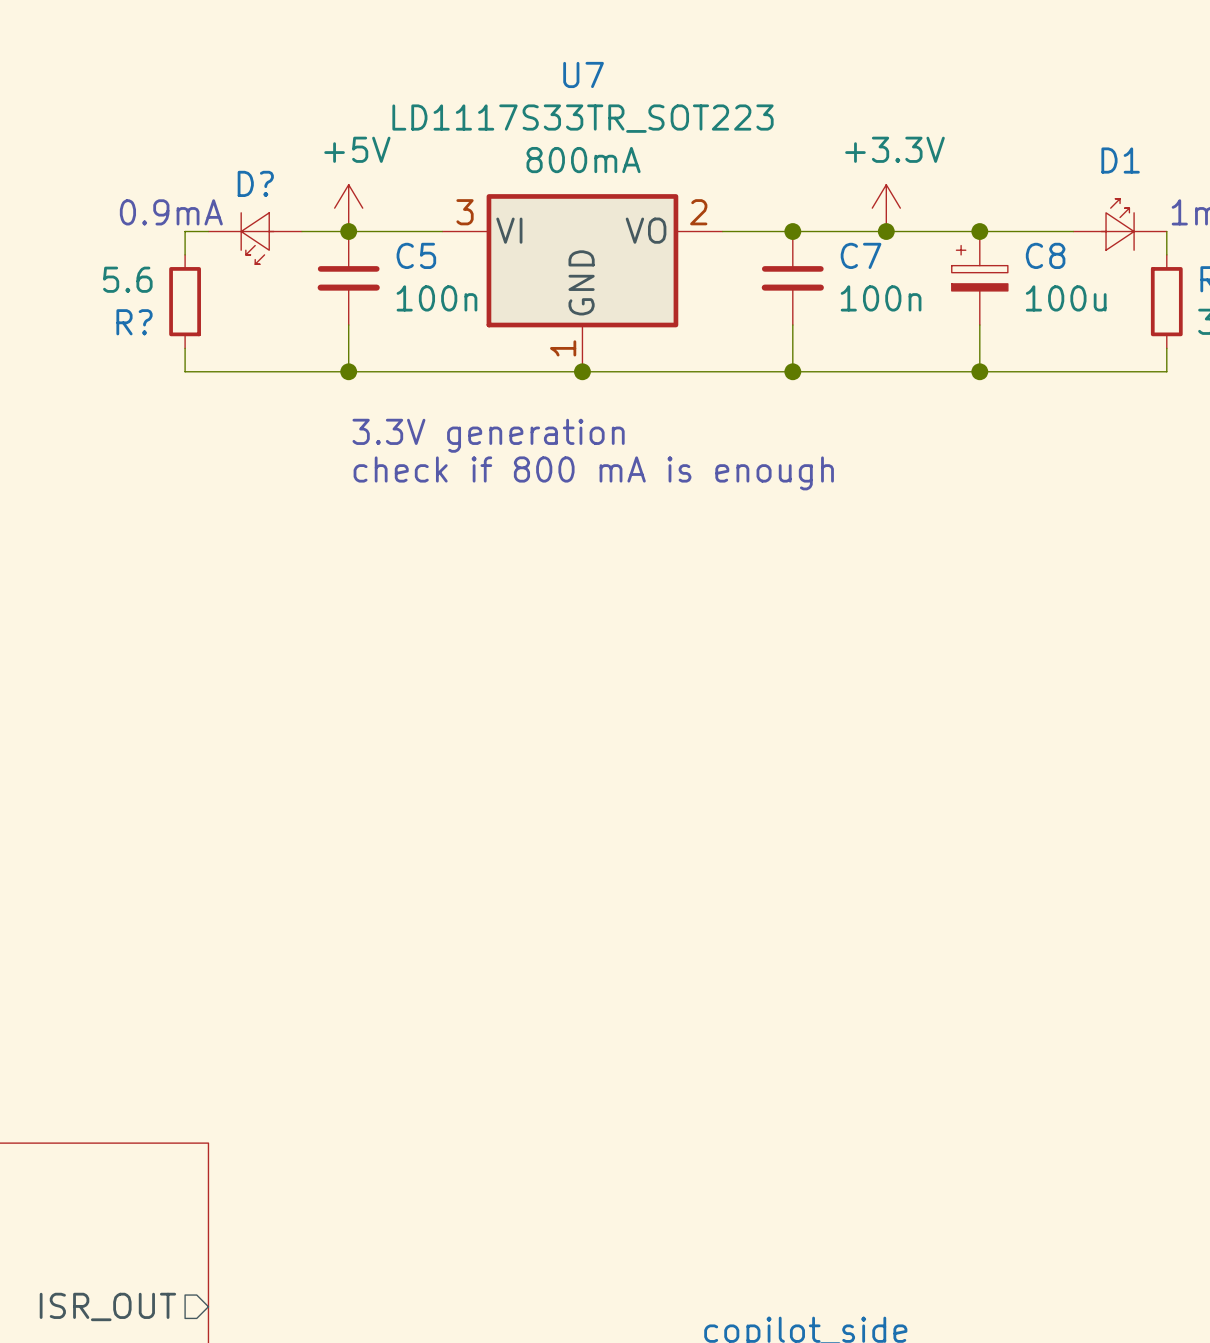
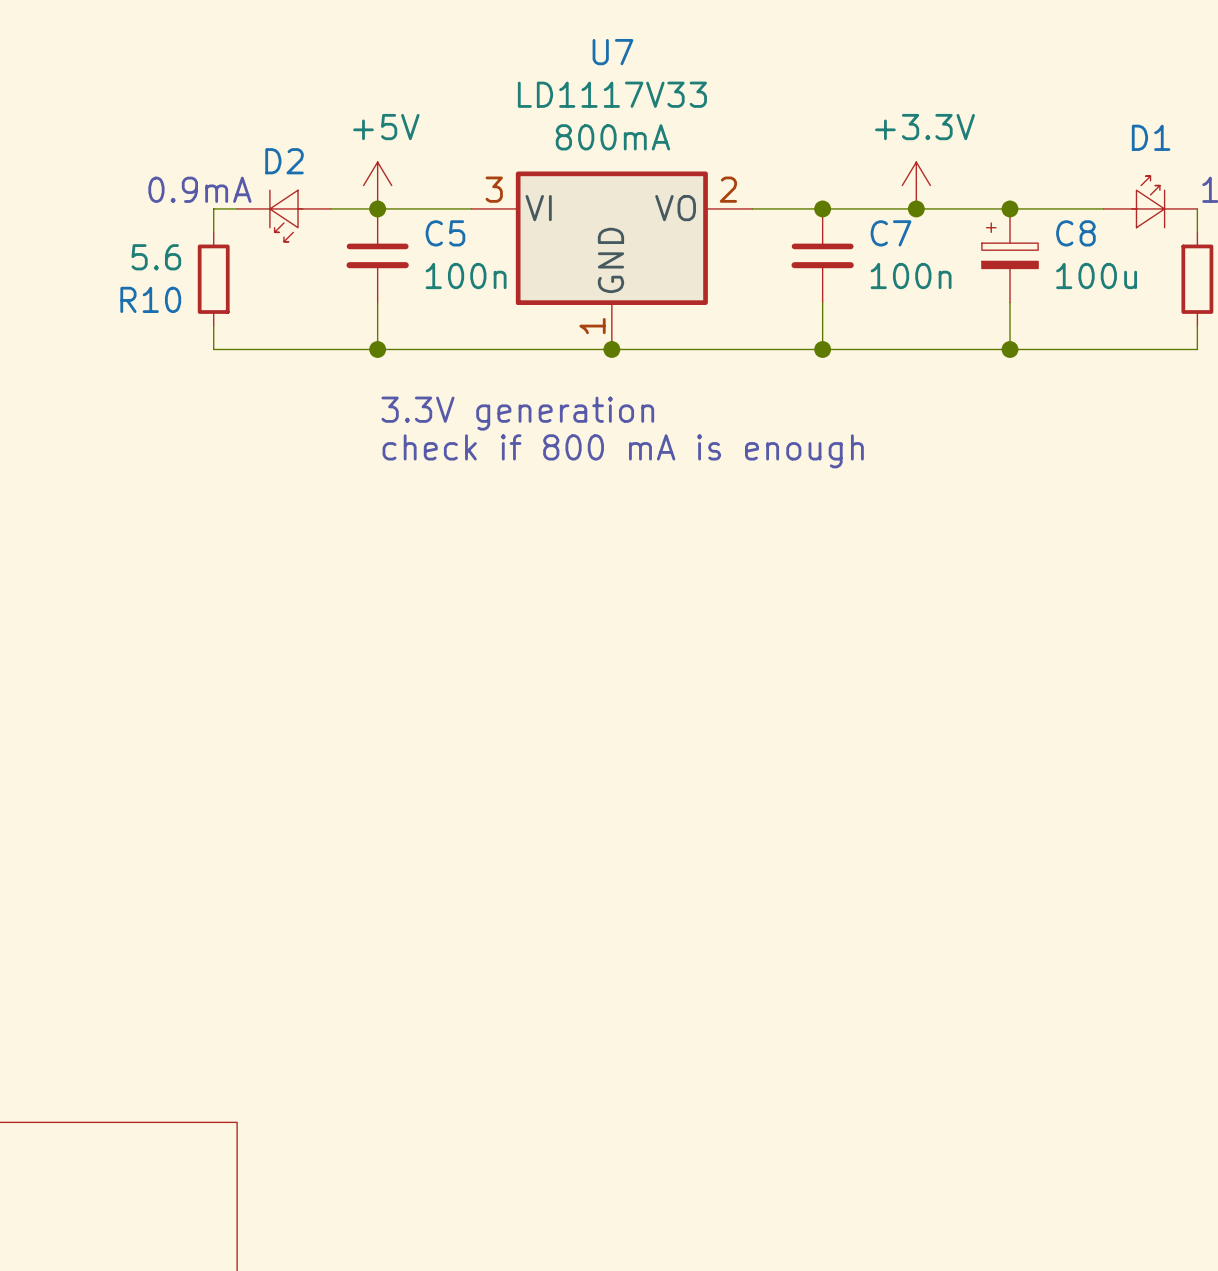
U7 value: LD1117S33TR_SOT223 (583, 118) -> LD1117V33 (612, 94)
D? name: D? (255, 183) -> D2 (284, 161)
R? name: R? (134, 322) -> R10 (150, 299)

